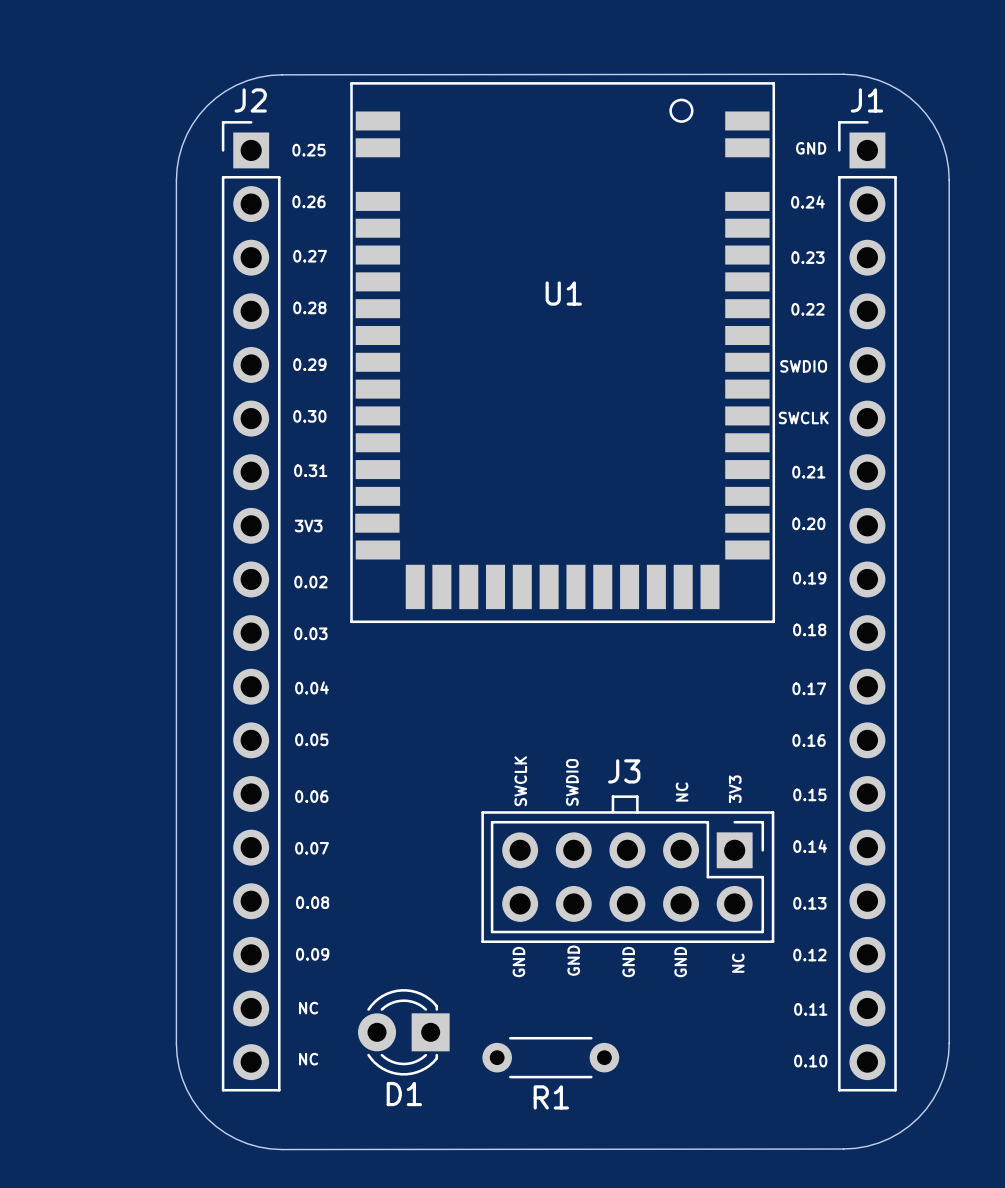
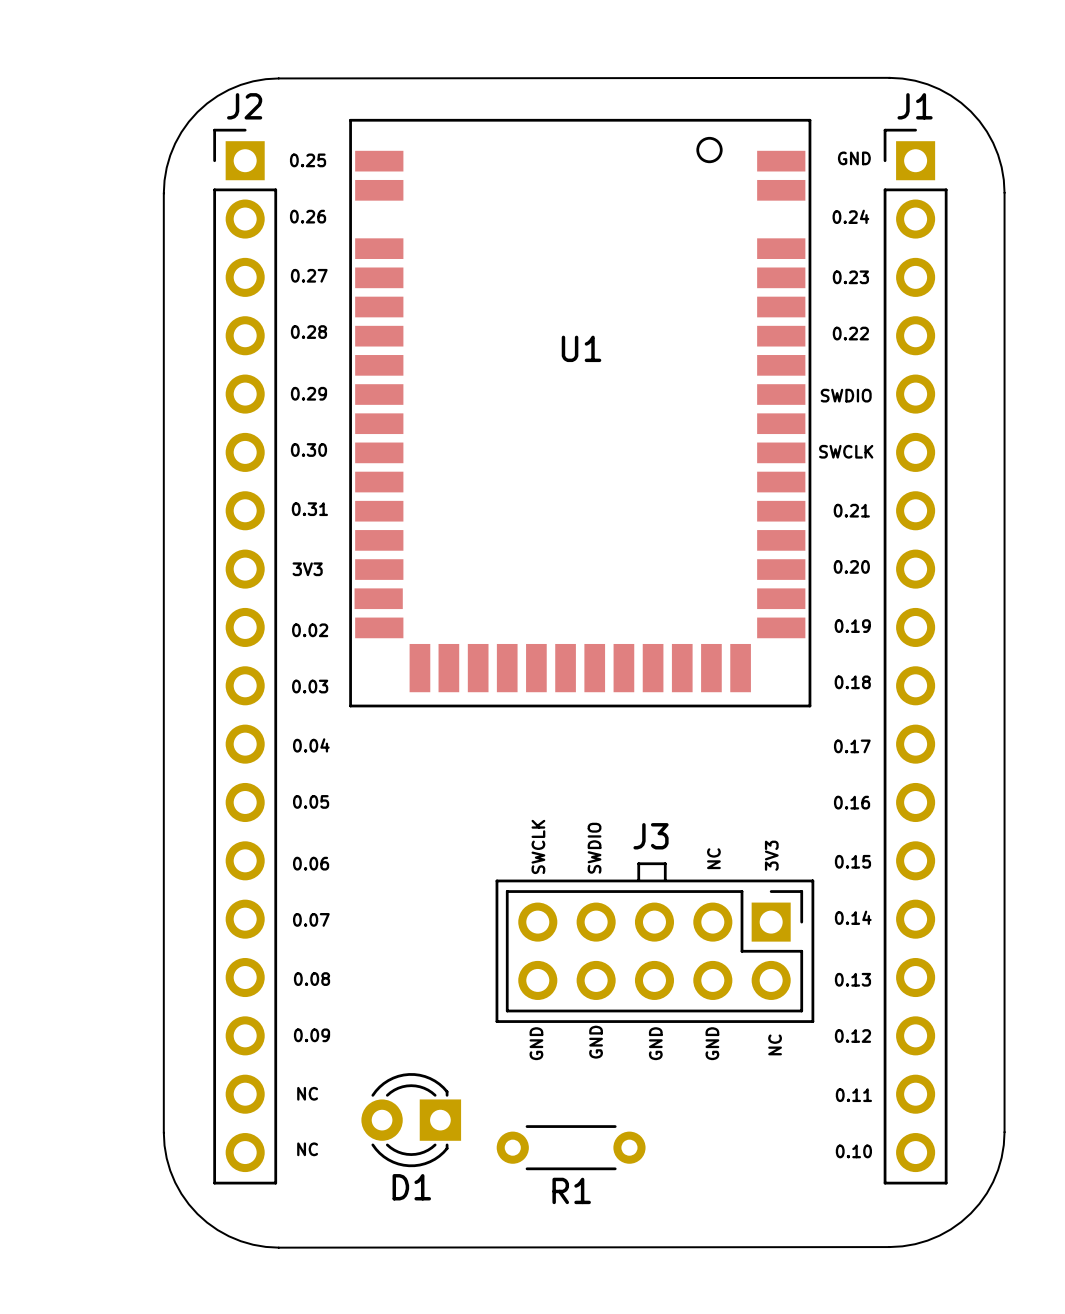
U1 position: (562, 352) -> (580, 413)

